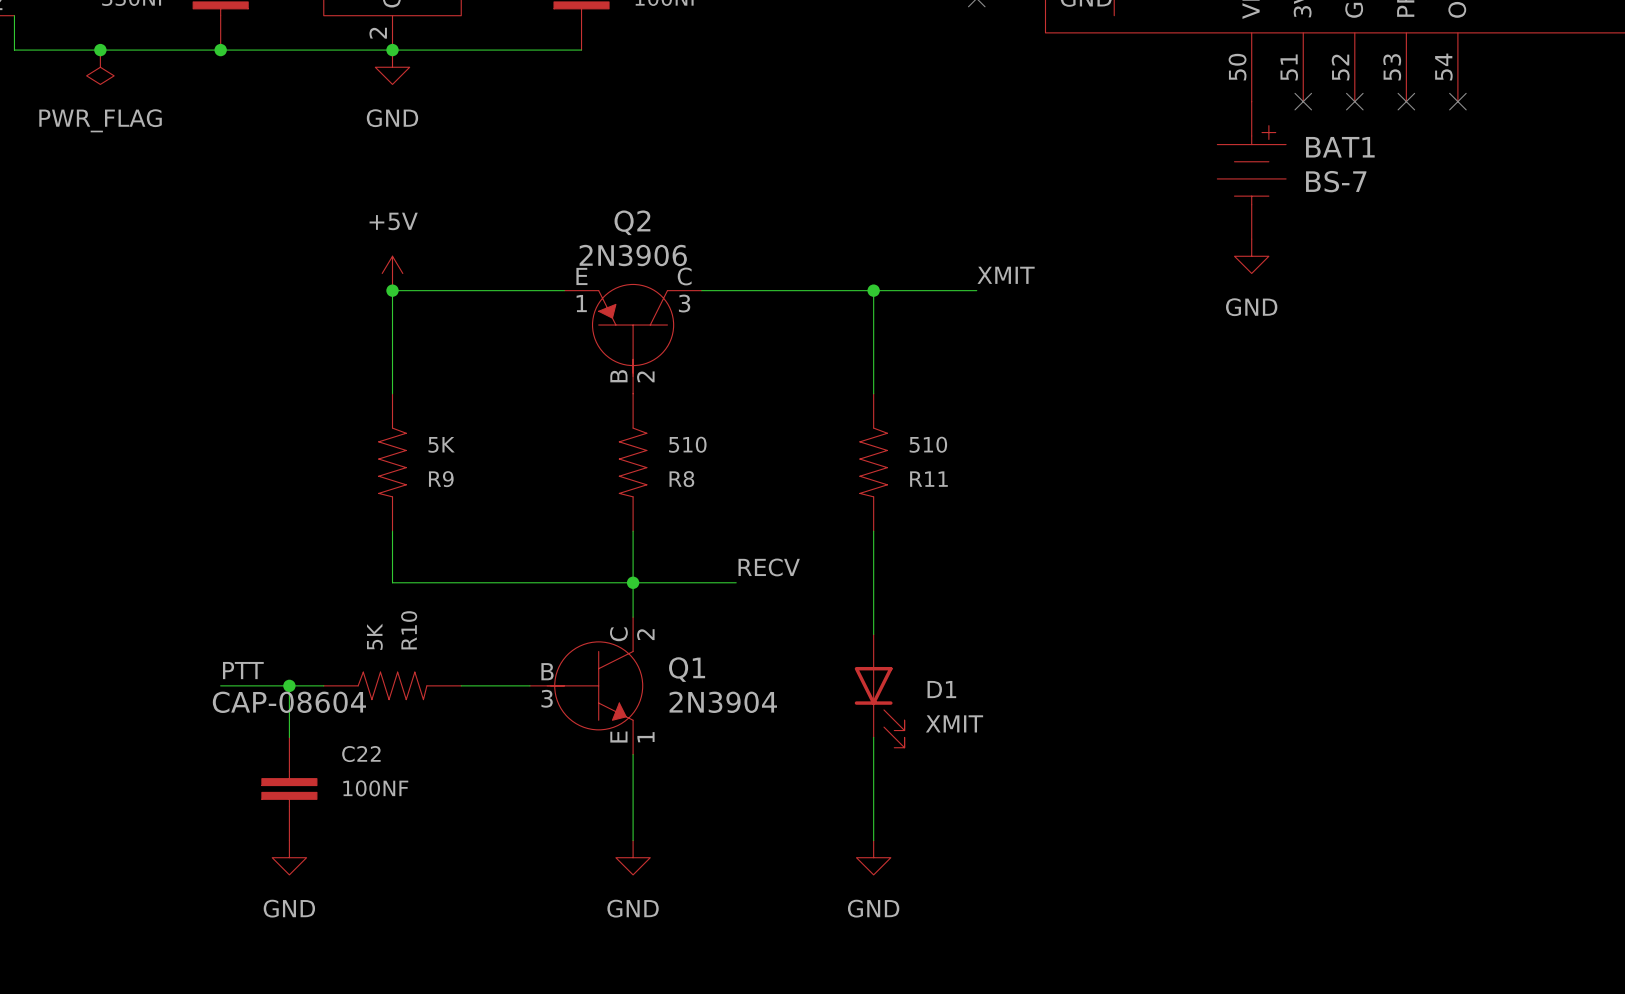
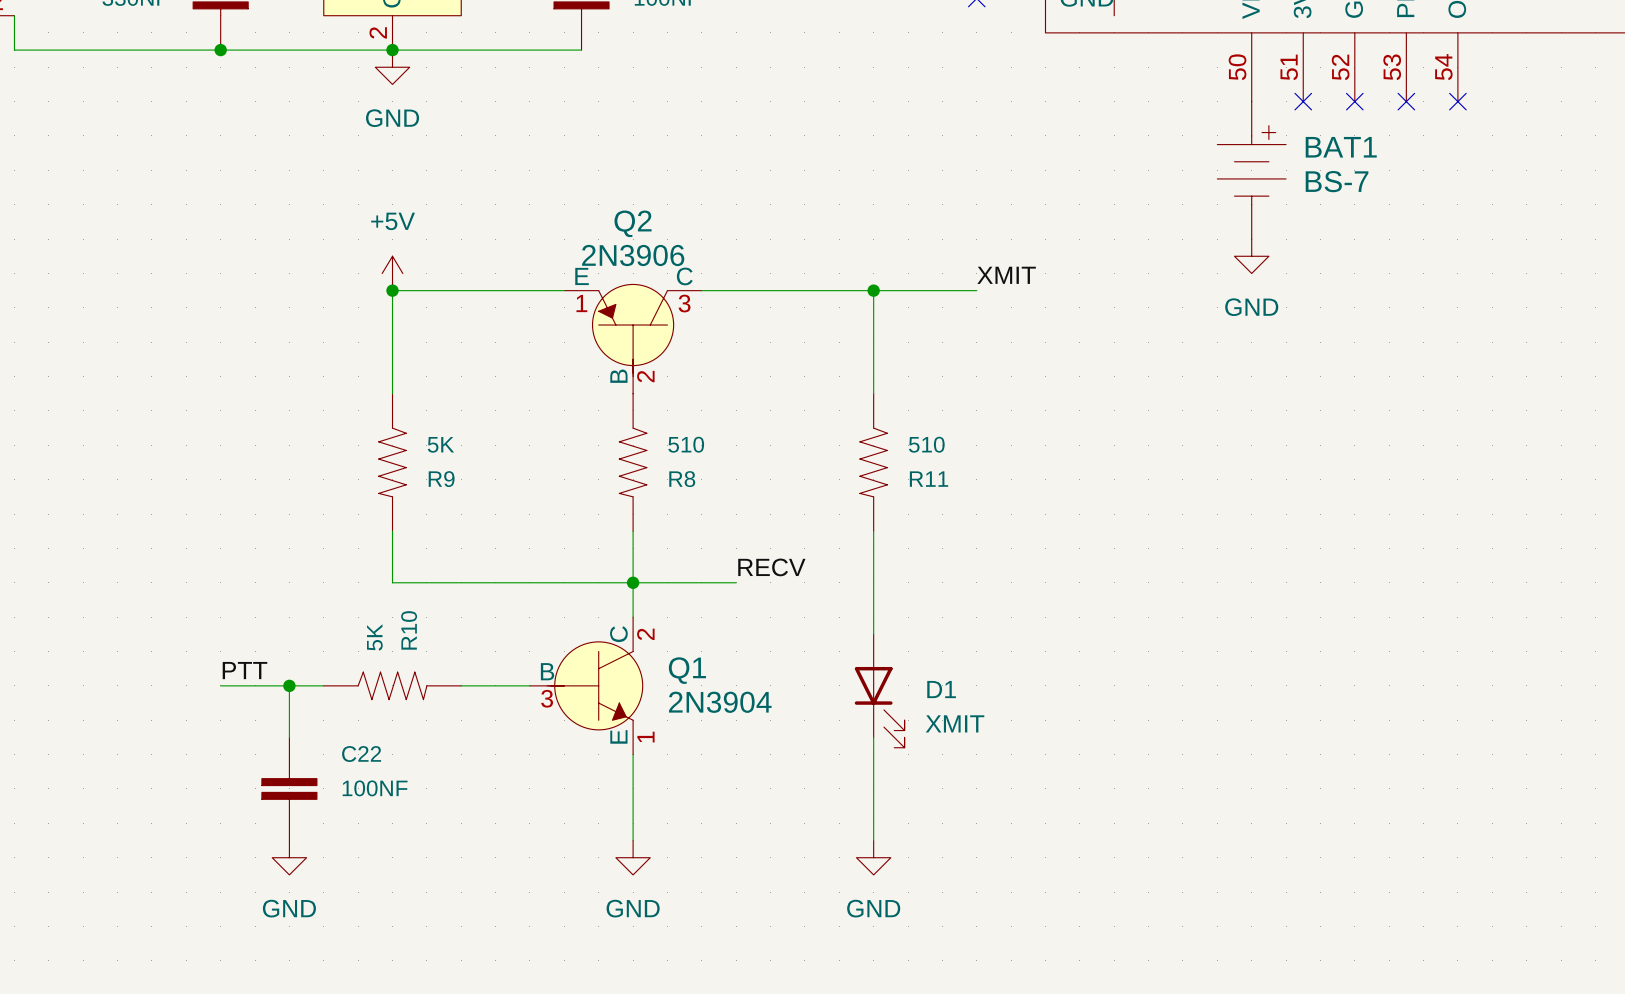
junction: (100, 50) -> none
power symbol: PWR_FLAG (100, 67) -> none
C22 text: CAP-08604 (289, 702) -> none

